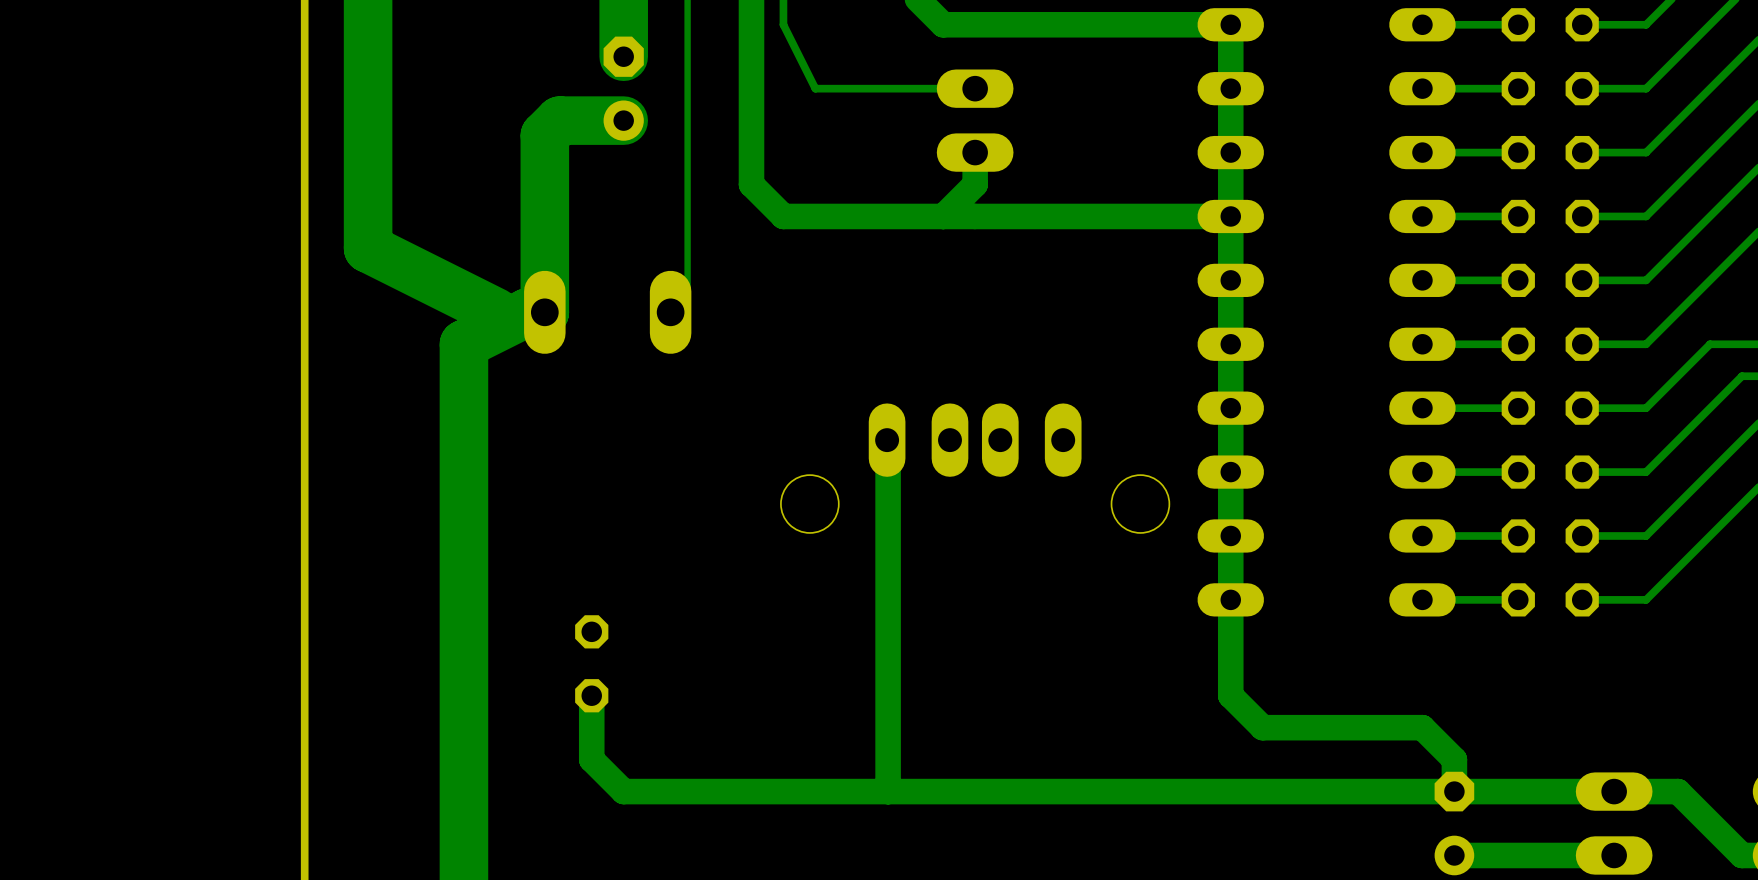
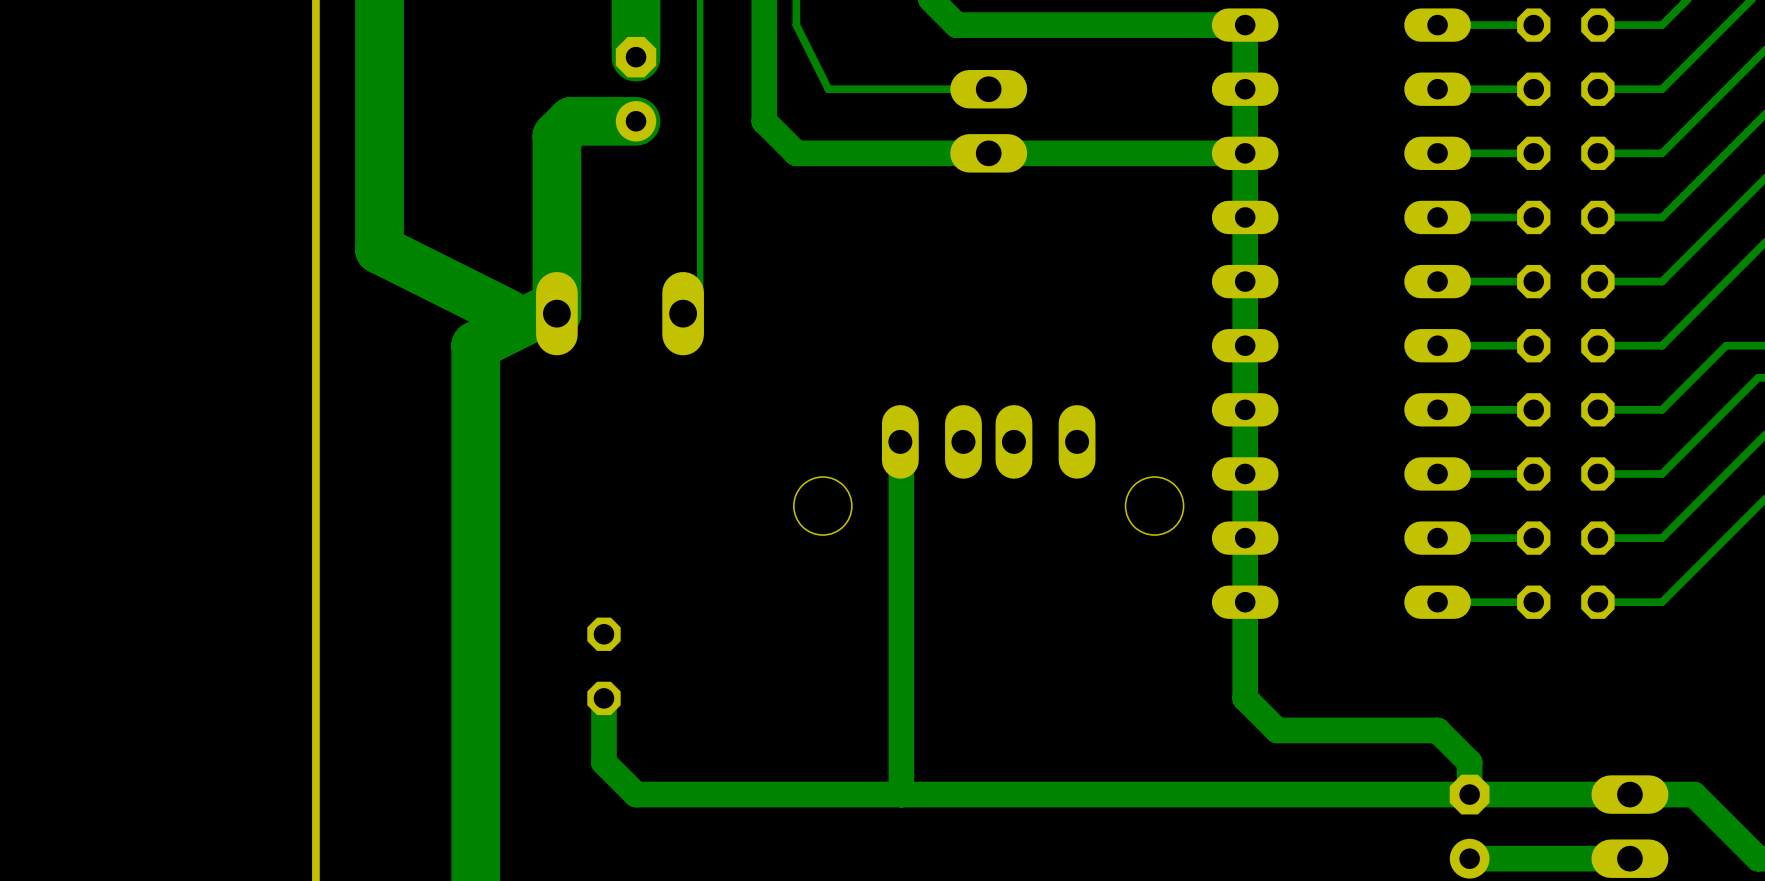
track: (751, 120) (751, 184) (783, 216) (974, 216) -> (764, 121) (796, 153) (1245, 153)
track: (975, 152) (975, 184) (943, 216) -> none
track: (1230, 216) (975, 216) -> none

